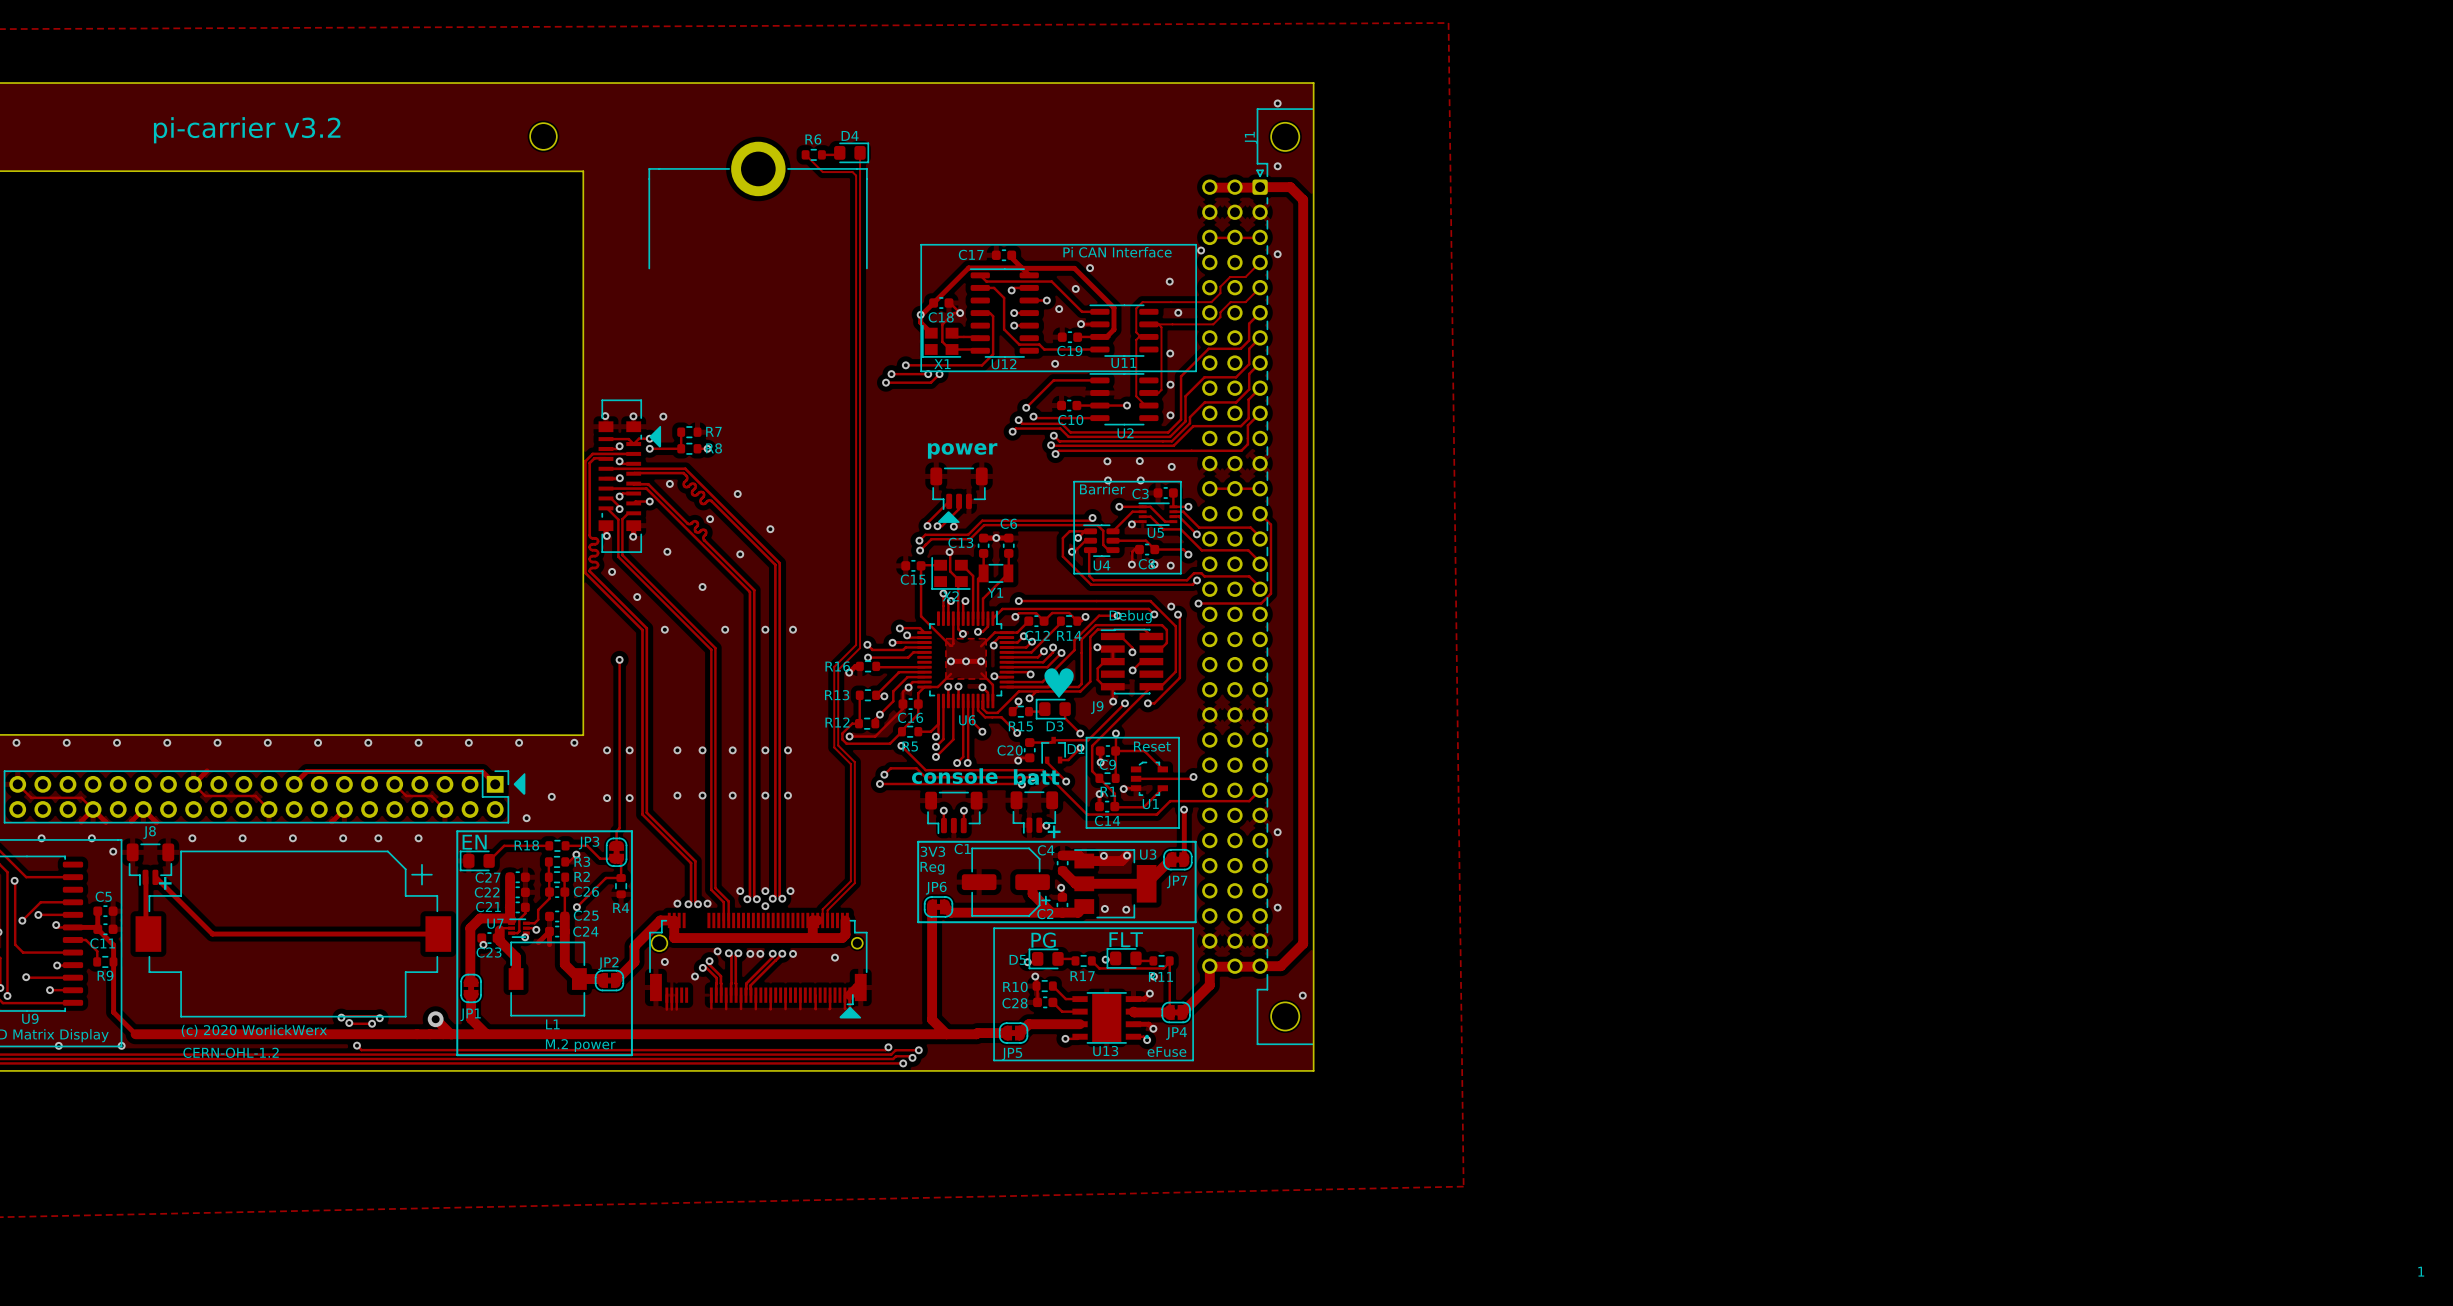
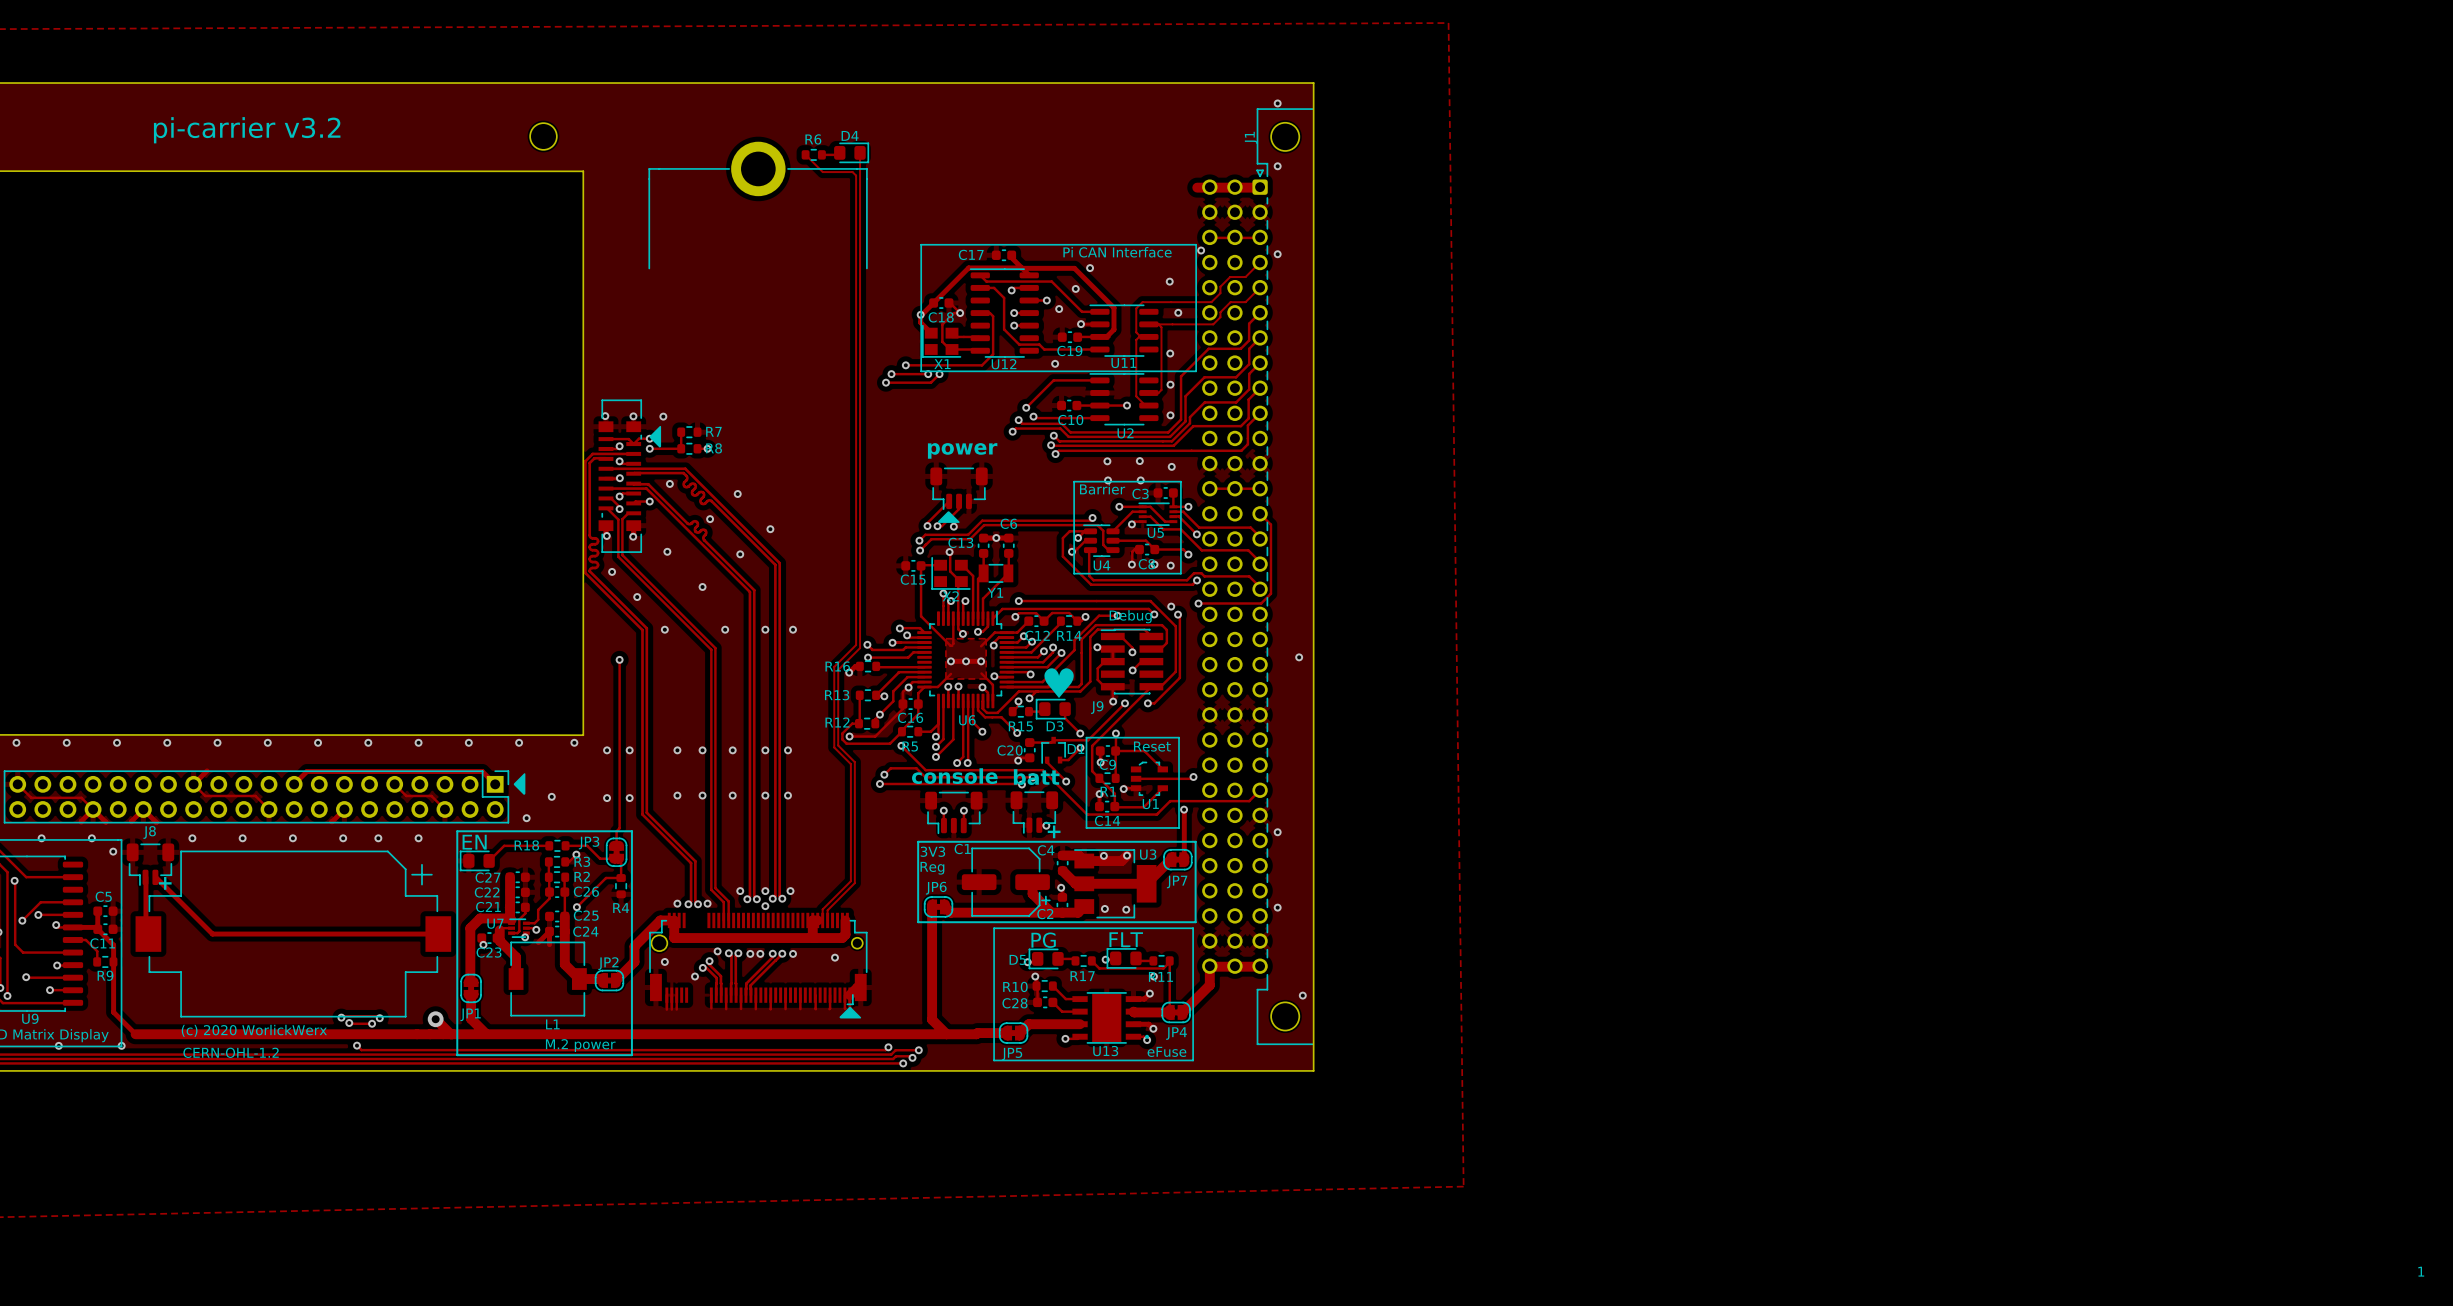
track: none -> (1197, 187) (1212, 187)
track: (1260, 187) (1290, 187) (1303, 199) (1303, 943) (1280, 966) (1260, 966) -> none
via: none -> (1299, 657)

